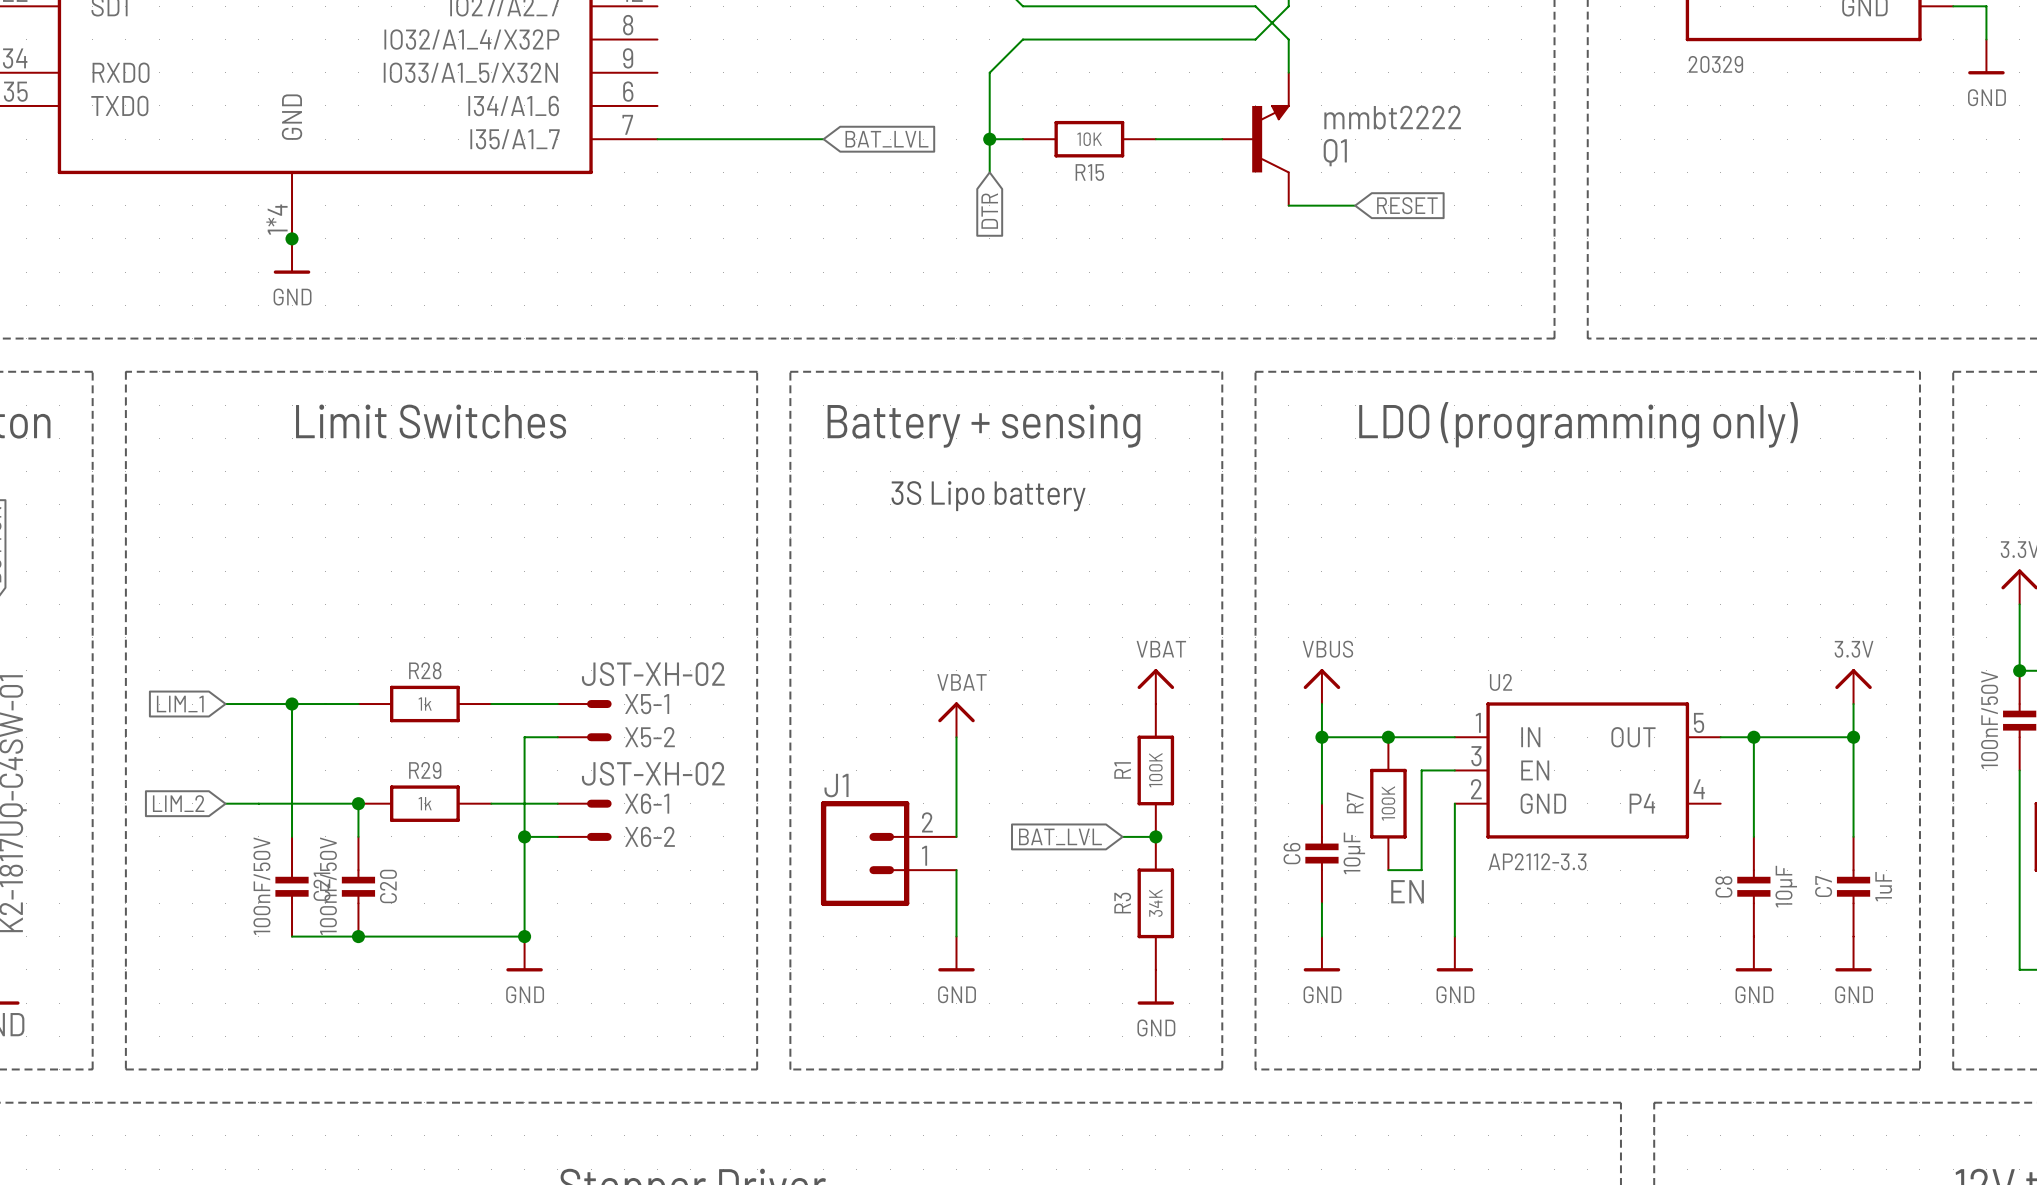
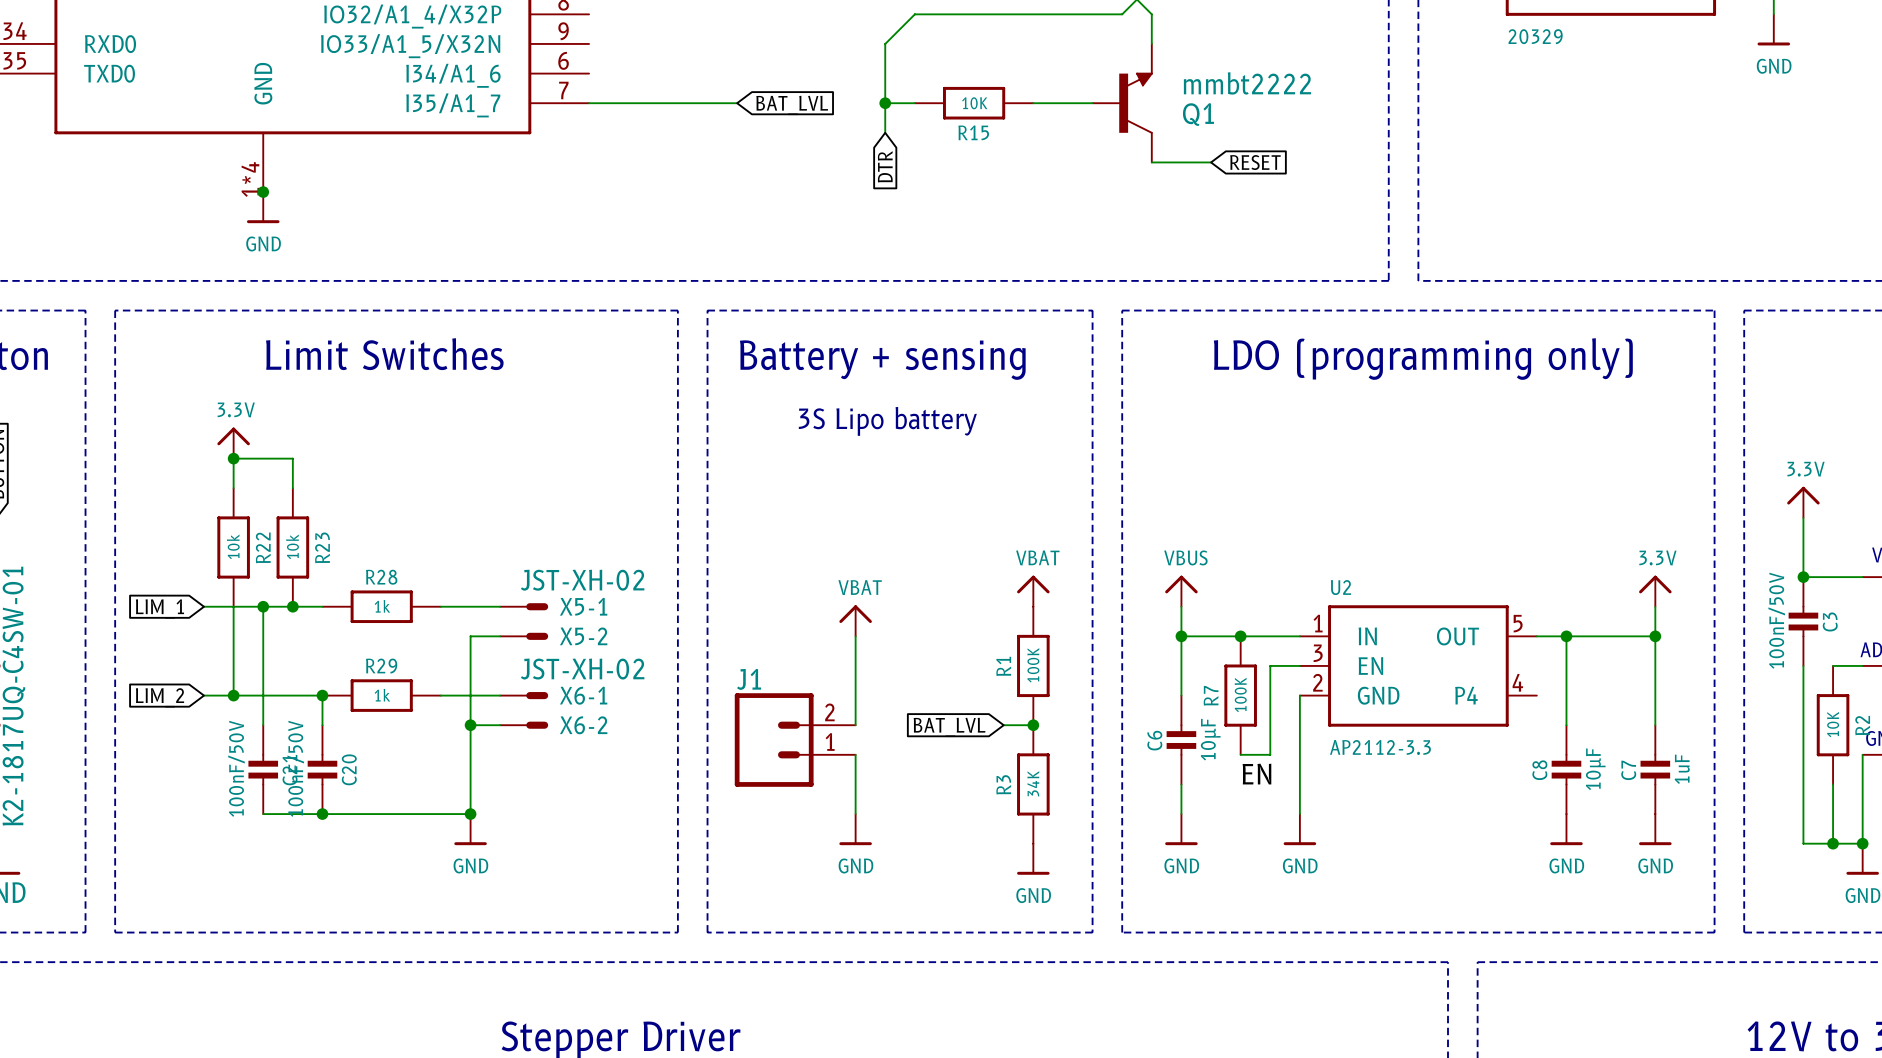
power symbol: none -> 3.3V (233, 443)
junction: none -> (233, 458)
wire: none -> (233, 488) (233, 458) (292, 458) (292, 488)
R22: none -> 10k (233, 547)
R23: none -> 10k (292, 547)
wire: none -> (233, 606) (233, 695)
junction: none -> (292, 606)
junction: none -> (233, 695)

